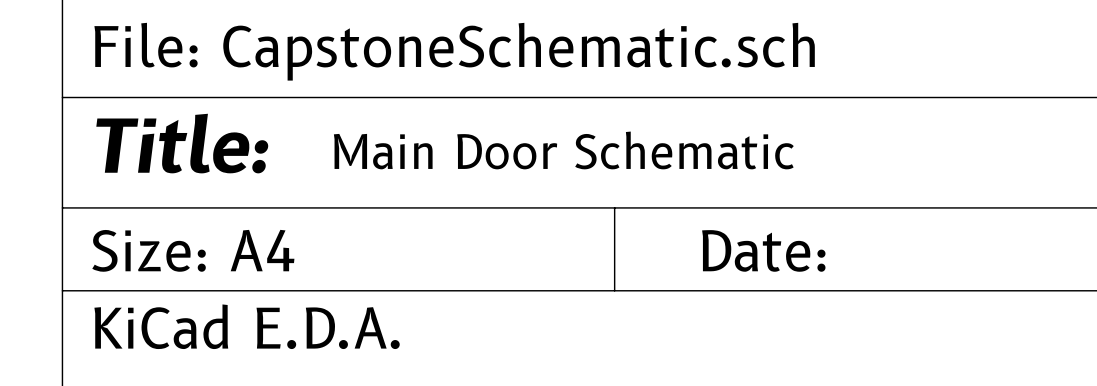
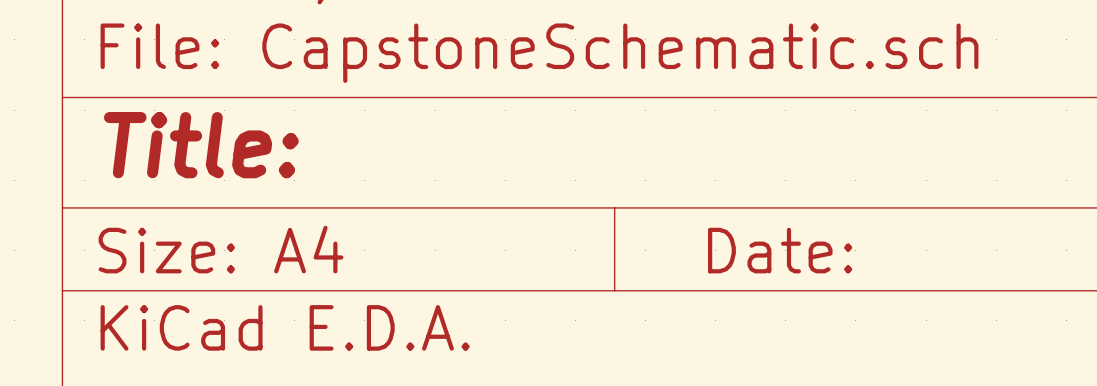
text: Main Door Schematic (563, 150) -> none

